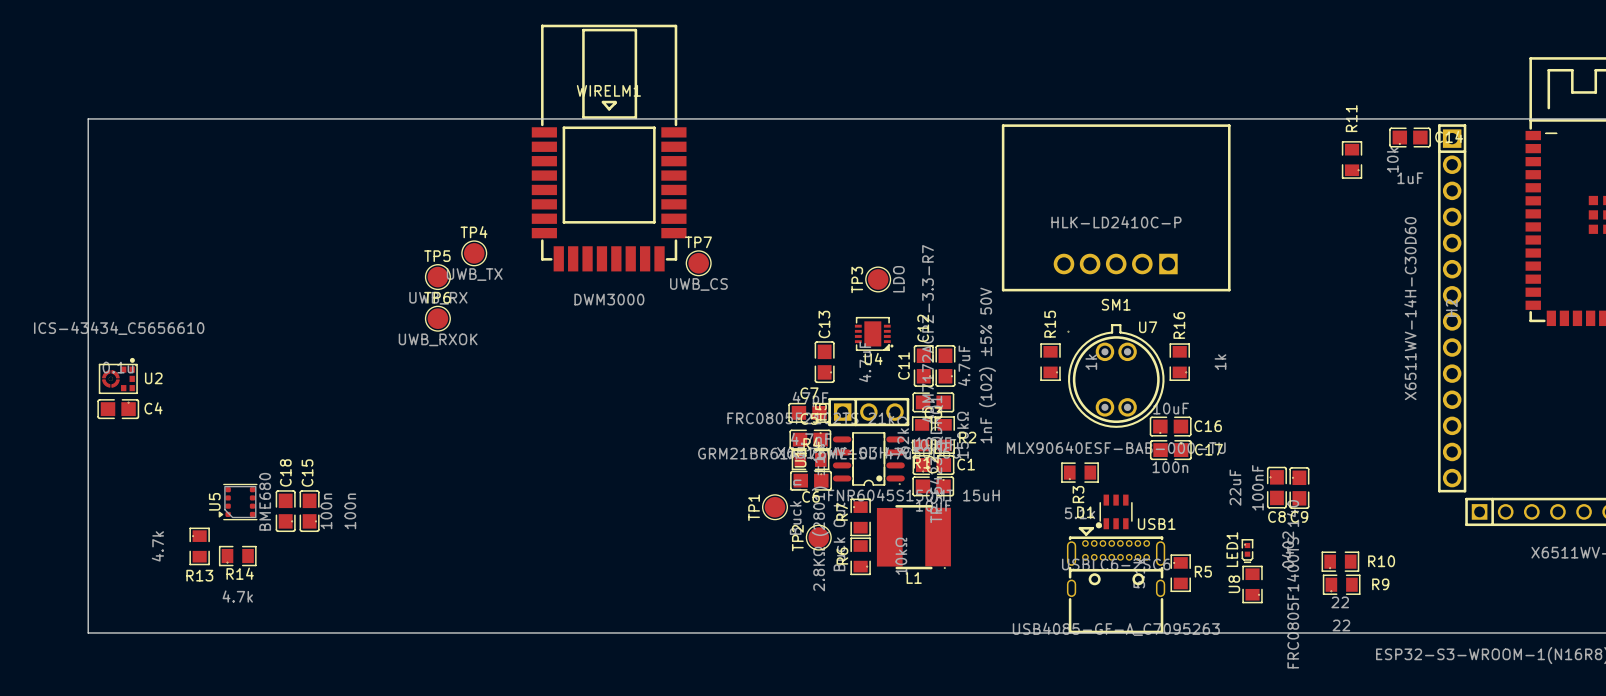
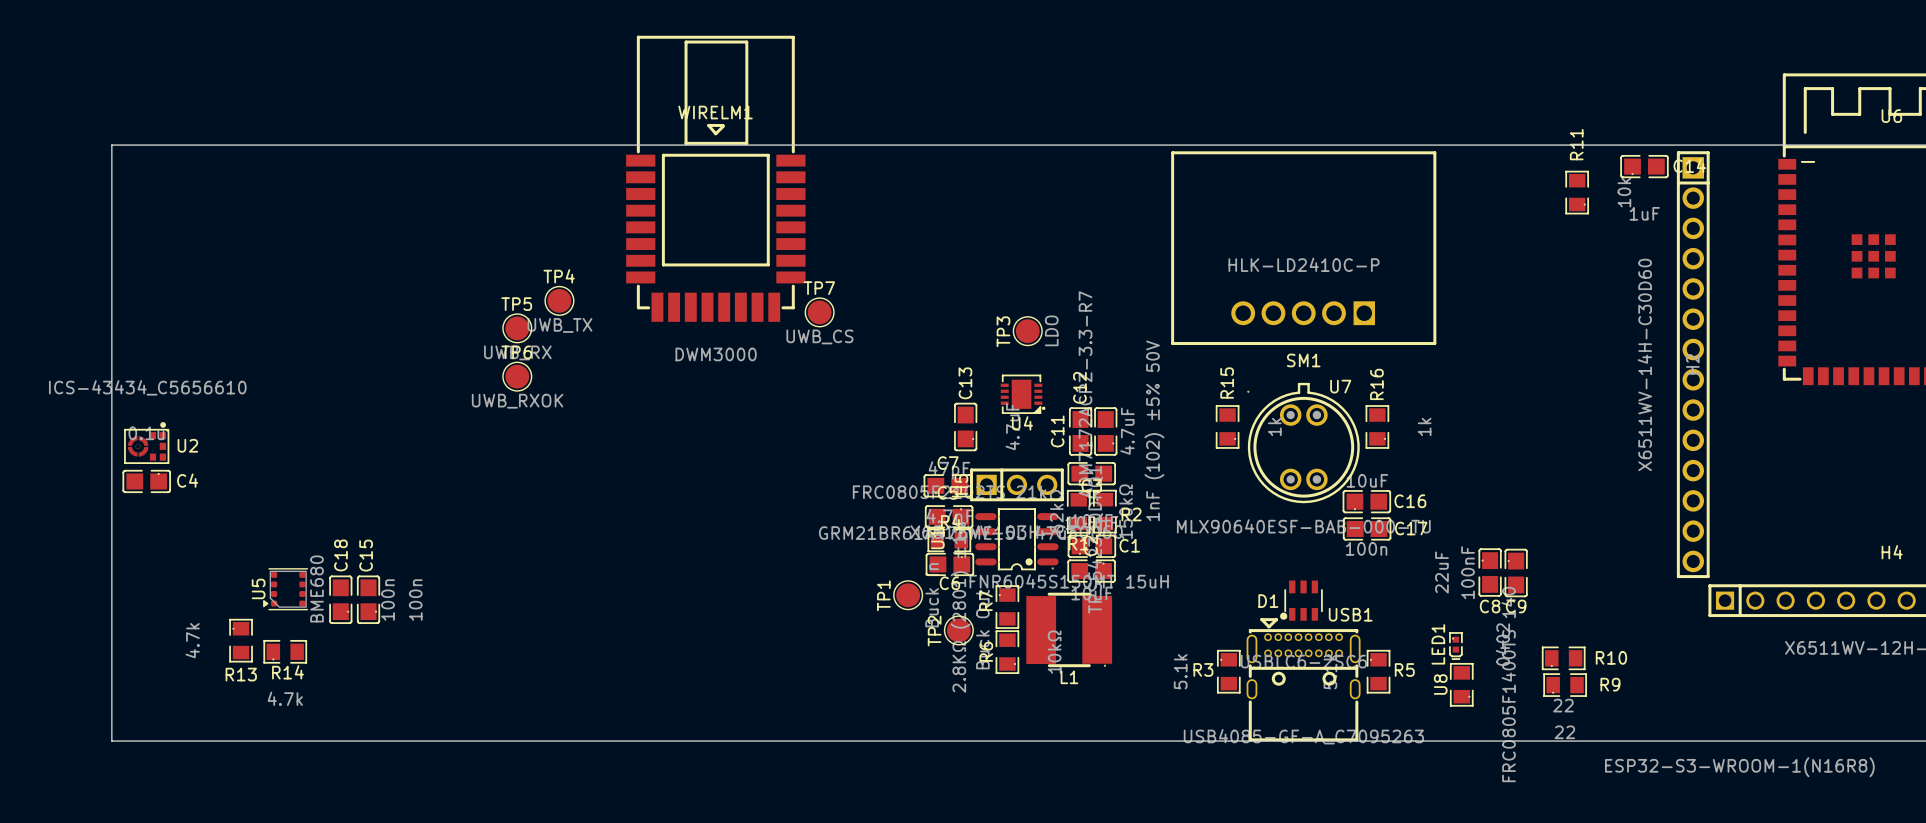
R3 rotation: 0° (1080, 472) -> 90° clockwise (1228, 671)
R3 position: (1080, 472) -> (1228, 671)

